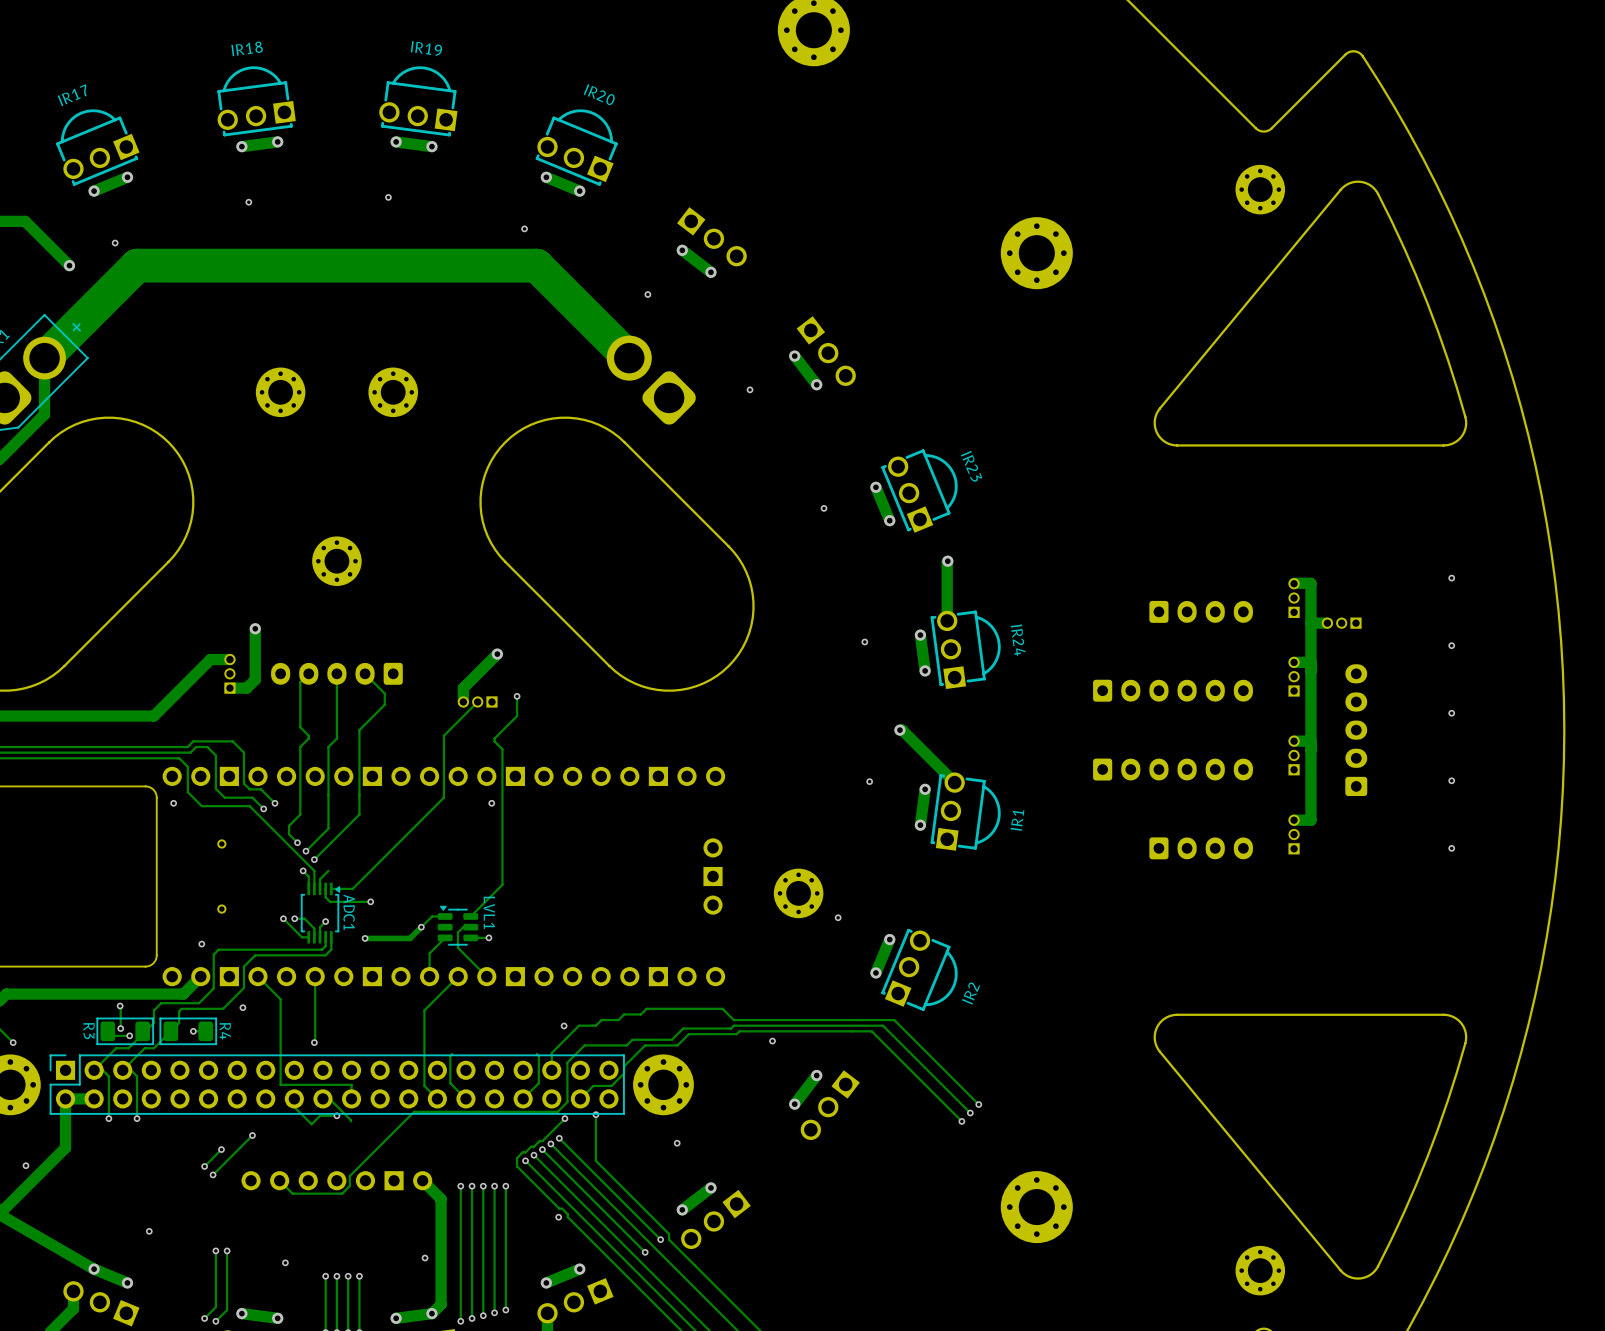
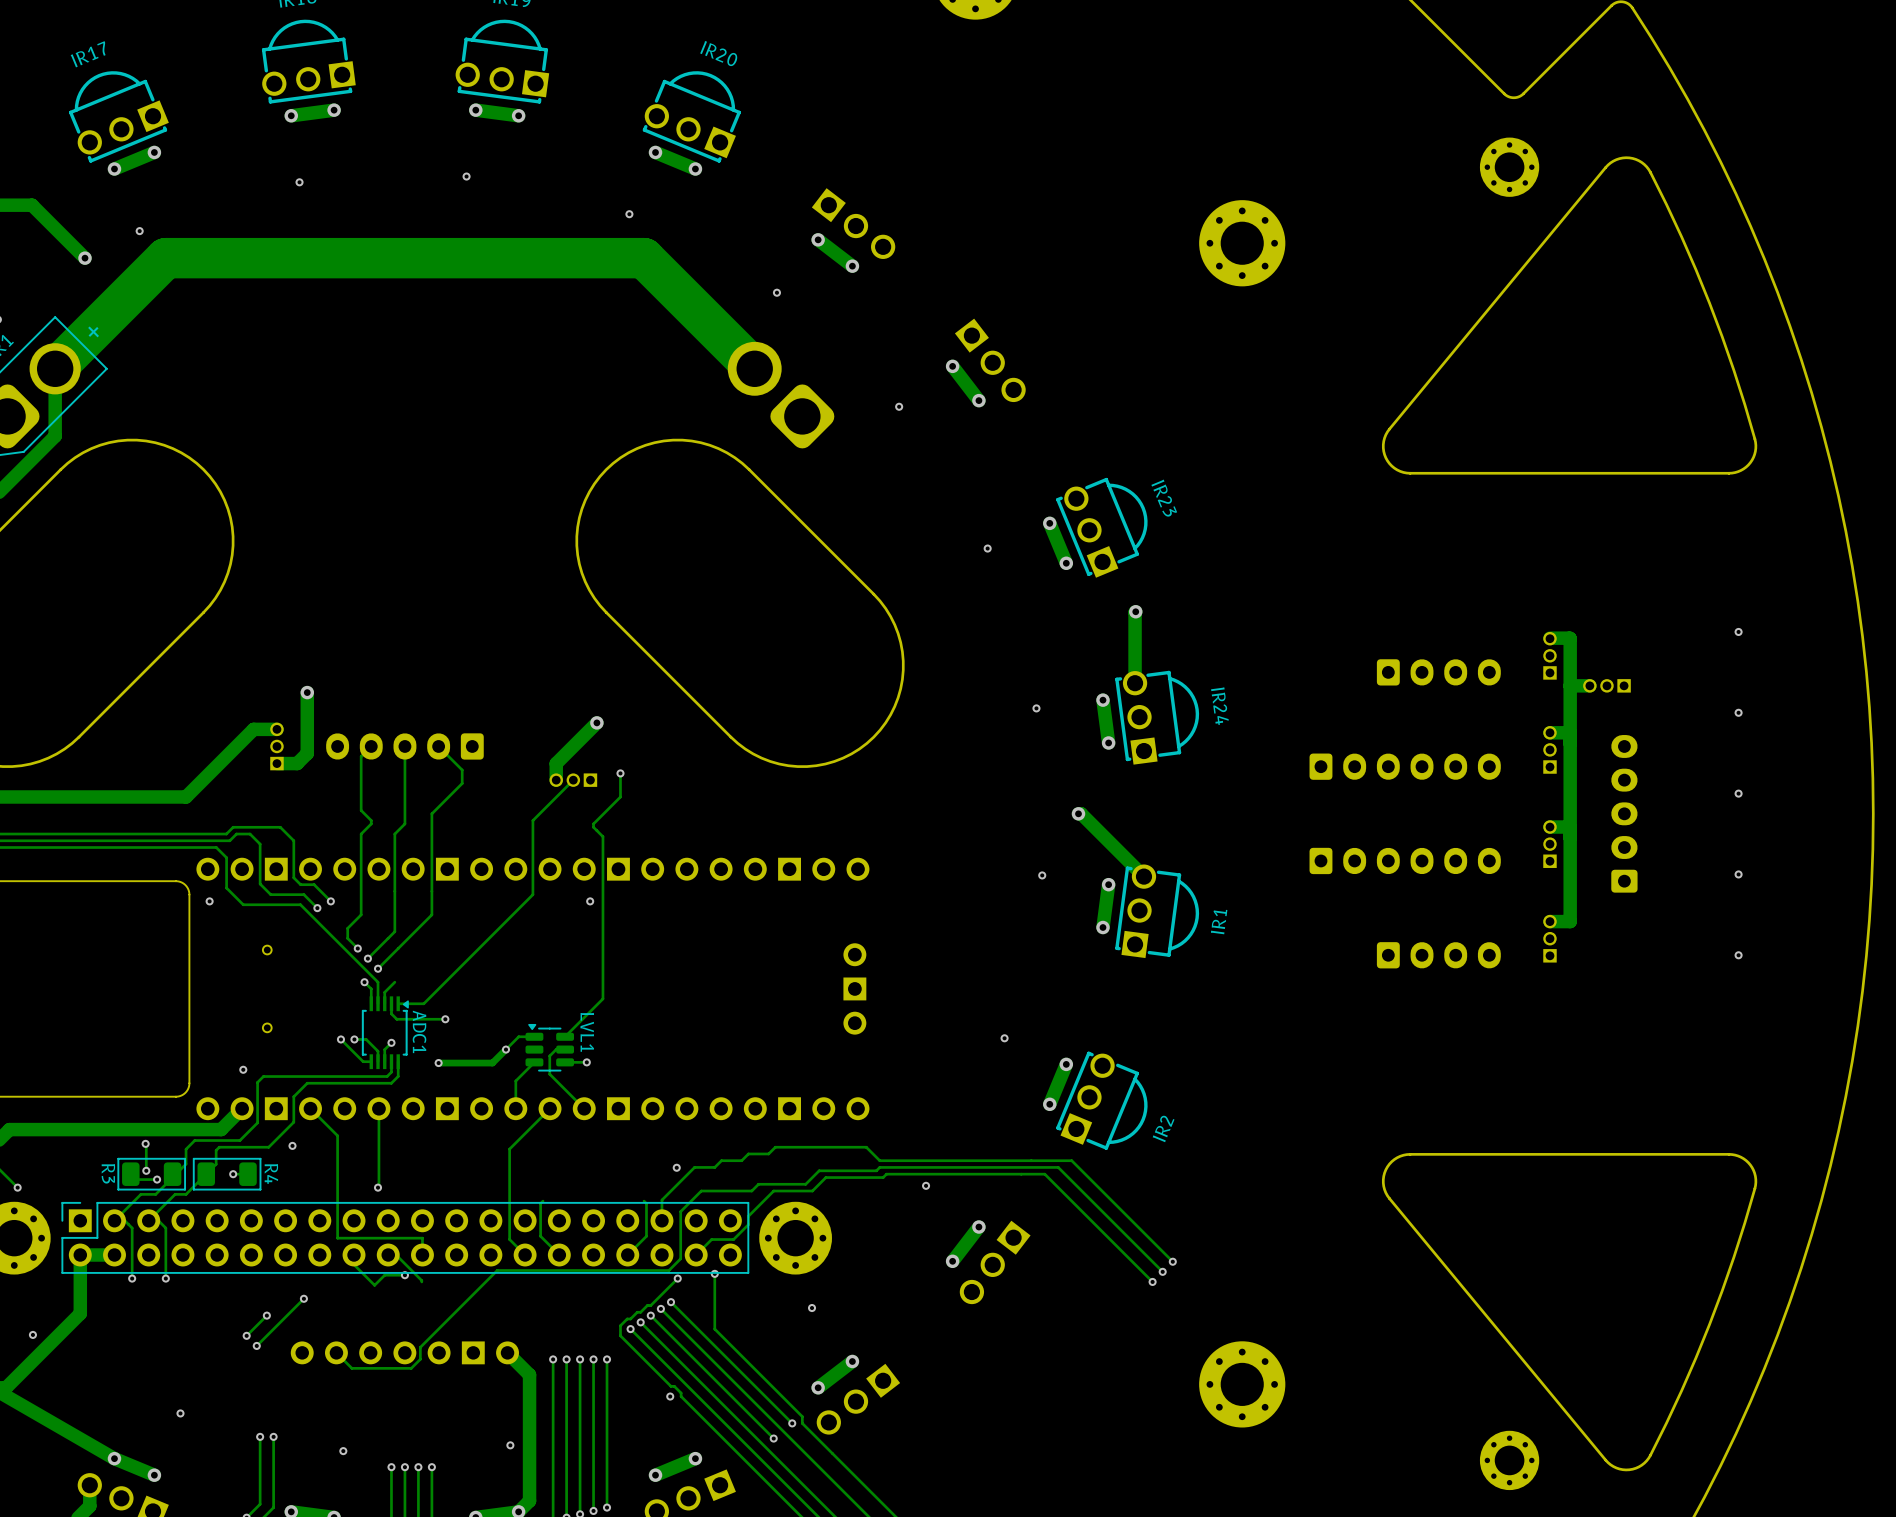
part: (280, 392) -> none
part: (393, 392) -> none
part: (336, 561) -> none
part: (798, 893) -> none

